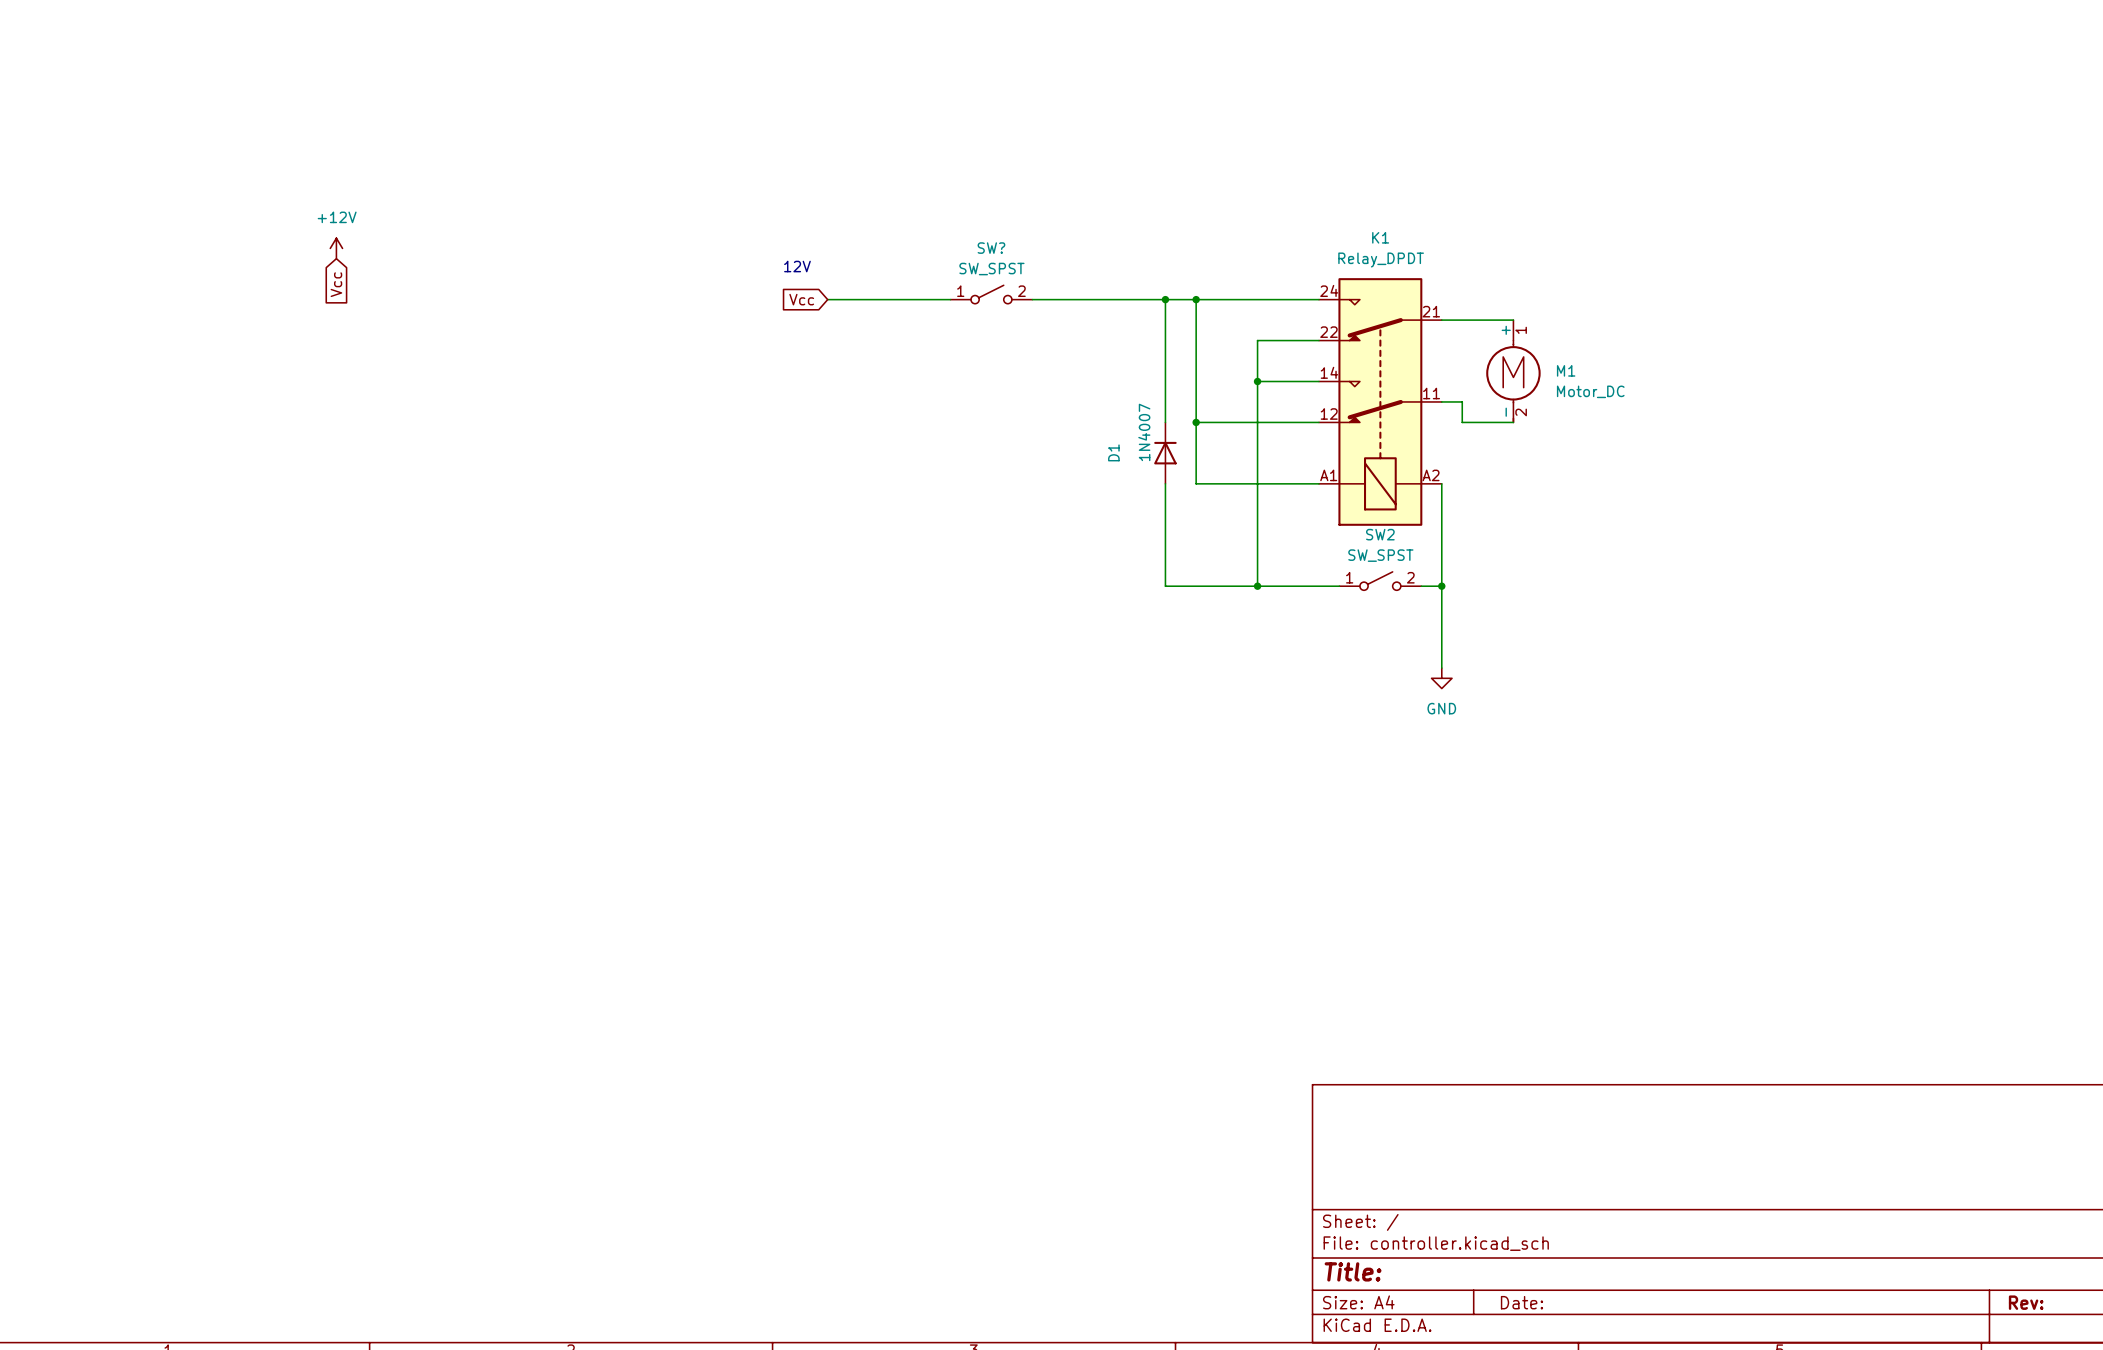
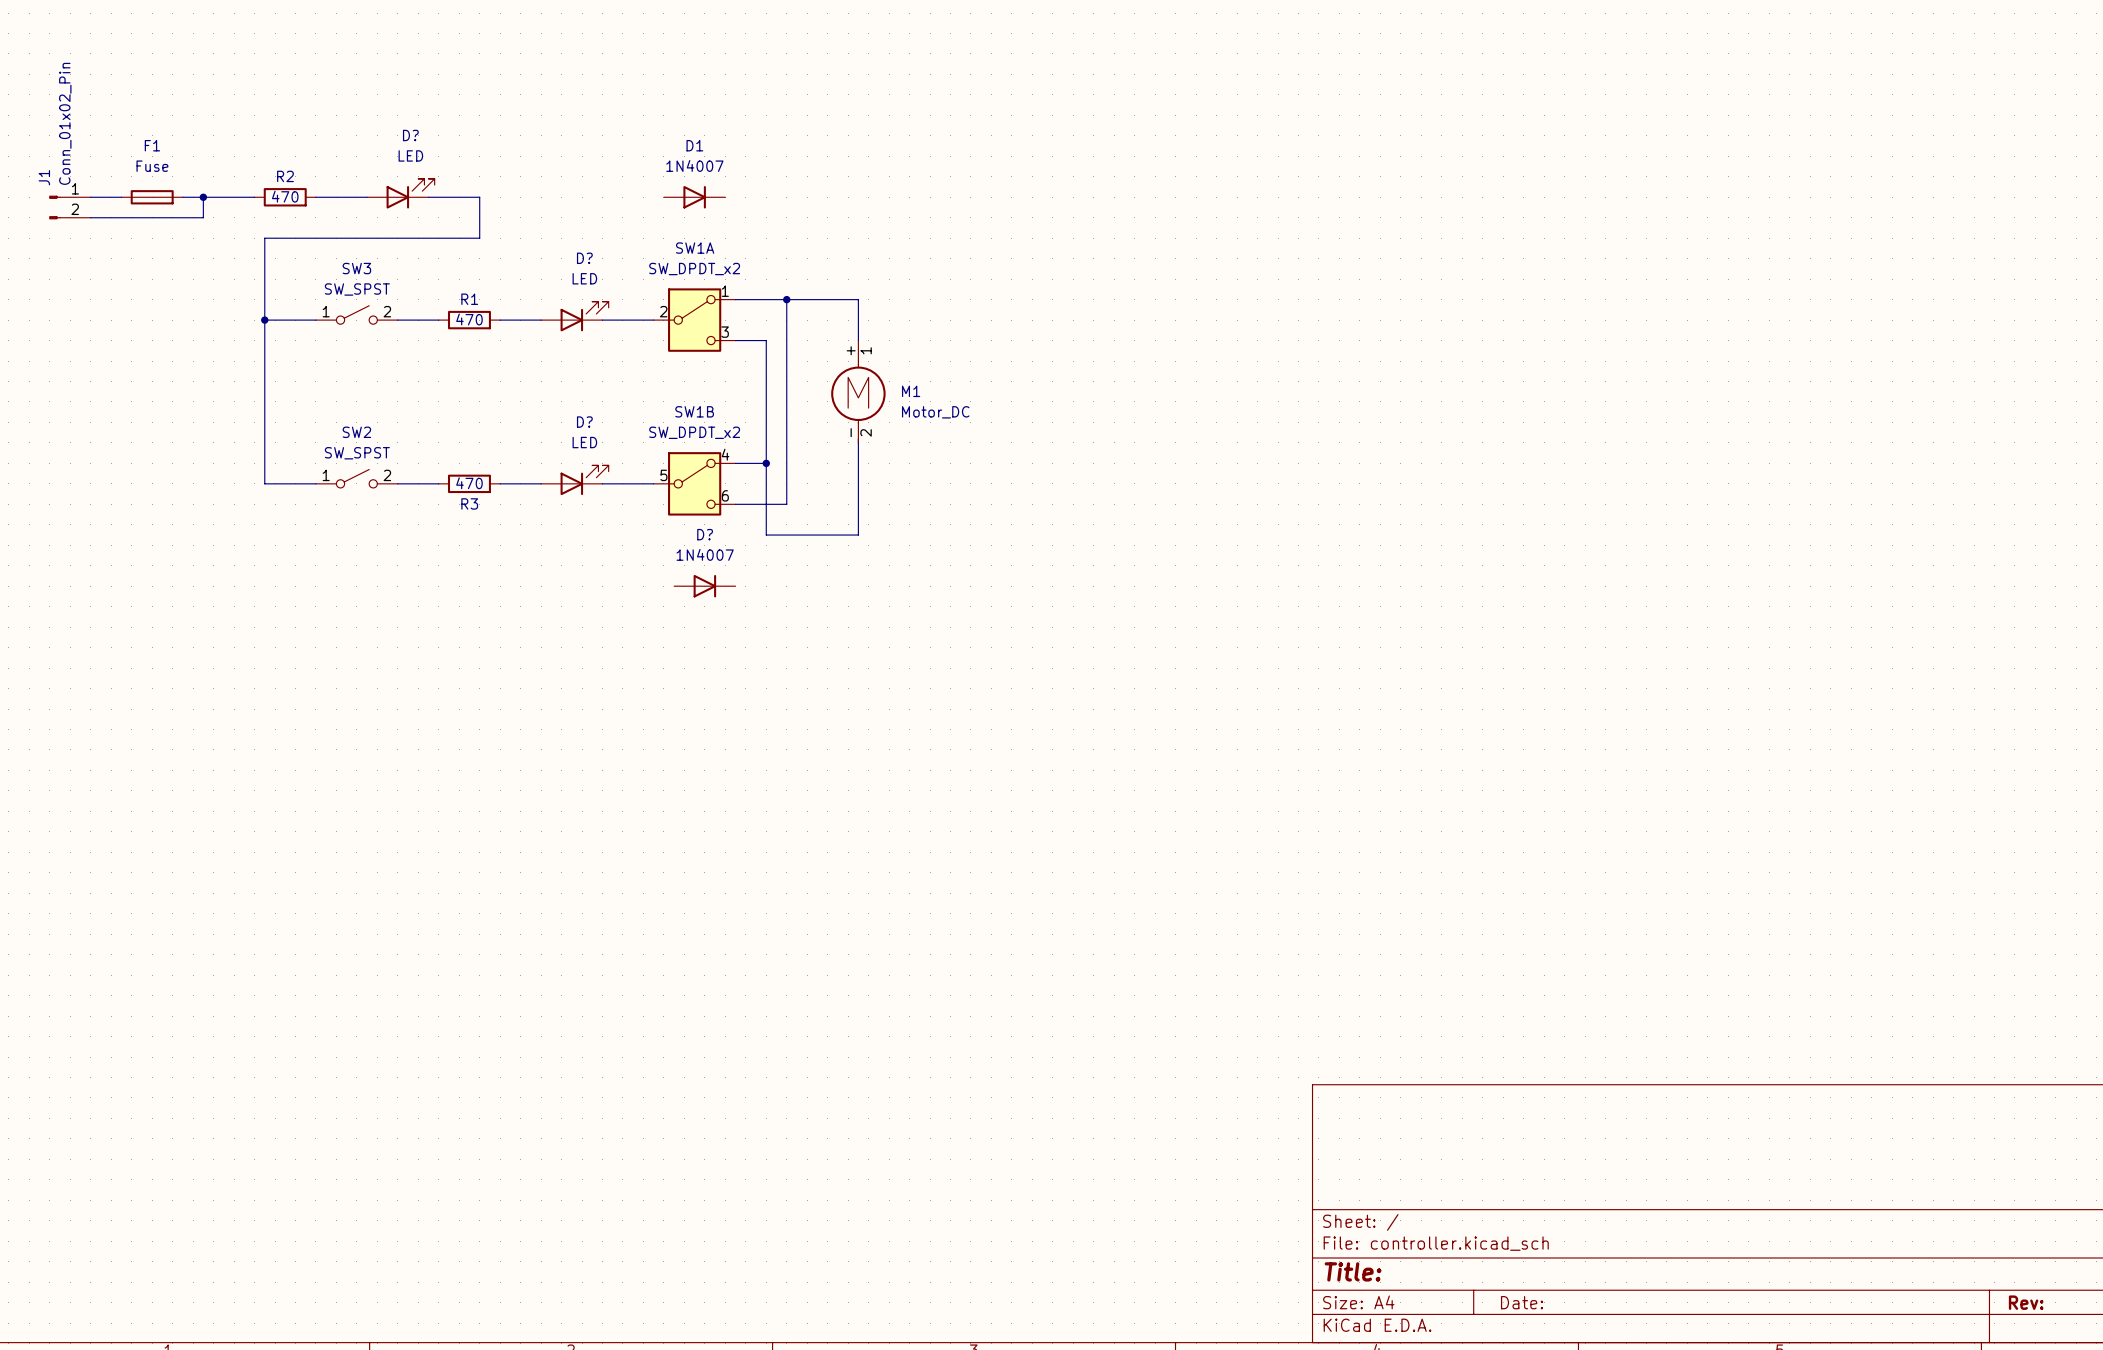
D?: none -> LED (400, 193)
wire: none -> (90, 197) (121, 197)
F1: none -> Fuse (152, 197)
wire: none -> (182, 197) (254, 197)
wire: none -> (203, 197) (203, 217) (90, 217)
junction: none -> (203, 197)
R2: none -> 470 (285, 197)
wire: none -> (315, 197) (367, 197)
wire: none -> (428, 197) (479, 197) (479, 238) (264, 238) (264, 483) (315, 483)
J1: none -> Conn_01x02_Pin (70, 207)
power symbol: +12V (336, 248) -> none
text: 12V (797, 266) -> none
global label: Vcc (336, 284) -> none
SW?: SW_SPST (991, 294) -> none
wire: none -> (735, 299) (827, 299)
wire: none -> (786, 299) (786, 504) (735, 504)
junction: none -> (786, 299)
global label: Vcc (801, 299) -> none
wire: (858, 299) (950, 299) -> (858, 299) (858, 340)
wire: (1032, 299) (1318, 299) -> none
wire: (1165, 299) (1165, 422) -> none
junction: (1165, 299) -> none
wire: (1196, 299) (1196, 483) (1318, 483) -> none
junction: (1196, 299) -> none
SW3: none -> SW_SPST (356, 314)
D?: none -> LED (574, 316)
wire: none -> (264, 320) (315, 320)
junction: none -> (264, 320)
wire: none -> (397, 320) (438, 320)
R1: none -> 470 (469, 320)
wire: none -> (500, 320) (541, 320)
wire: none -> (602, 320) (653, 320)
SW1A: none -> SW_DPDT_x2 (694, 320)
wire: (1441, 320) (1513, 320) -> none
wire: none -> (735, 340) (766, 340) (766, 535) (858, 535) (858, 442)
wire: (1318, 340) (1257, 340) (1257, 586) -> none
M1 position: (1513, 371) -> (858, 391)
wire: (1257, 381) (1318, 381) -> none
junction: (1257, 381) -> none
K1: Relay_DPDT (1380, 401) -> none
wire: (1441, 401) (1462, 401) (1462, 422) (1513, 422) -> none
wire: (1196, 422) (1318, 422) -> none
junction: (1196, 422) -> none
D1 value position: 1N4007 (1144, 432) -> 1N4007 (694, 165)
D1 rotation: 0° (1165, 453) -> 90° clockwise (694, 197)
D1 position: (1165, 453) -> (694, 197)
wire: none -> (735, 463) (766, 463)
junction: none -> (766, 463)
D?: none -> LED (574, 480)
wire: none -> (397, 483) (438, 483)
R3: none -> 470 (469, 483)
wire: none -> (500, 483) (541, 483)
wire: none -> (602, 483) (653, 483)
SW1B: none -> SW_DPDT_x2 (694, 483)
wire: (1165, 483) (1165, 586) (1339, 586) -> none
wire: (1441, 483) (1441, 668) -> none
SW2 position: (1380, 581) -> (356, 478)
D?: none -> 1N4007 (704, 586)
junction: (1257, 586) -> none
wire: (1421, 586) (1441, 586) -> none
junction: (1441, 586) -> none
power symbol: GND (1441, 678) -> none

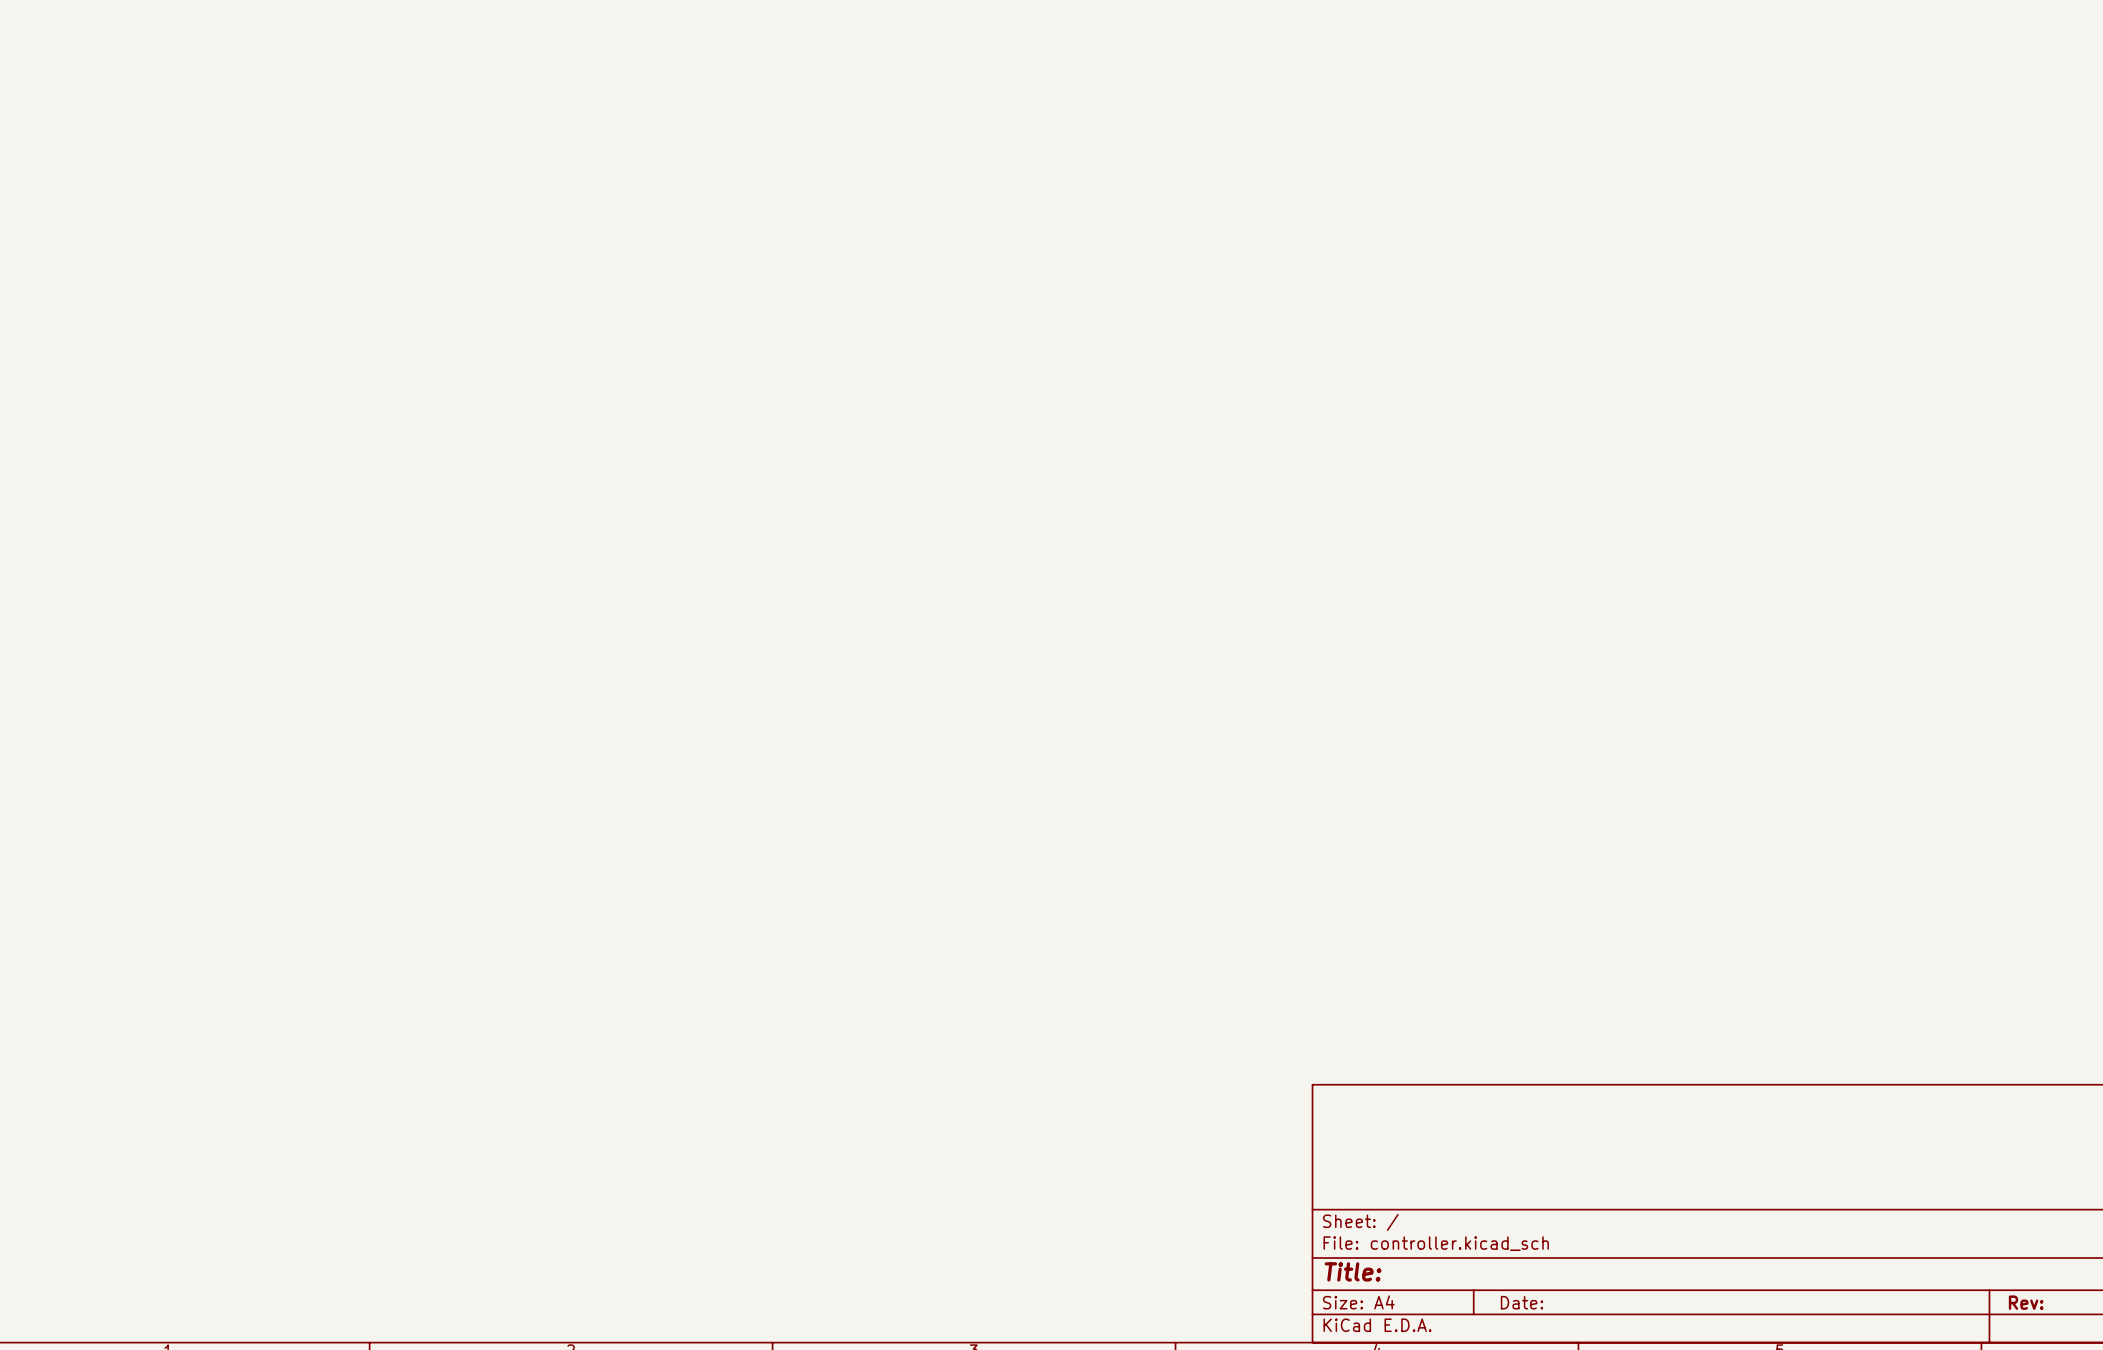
D?: LED (400, 193) -> none
wire: (90, 197) (121, 197) -> none
F1: Fuse (152, 197) -> none
wire: (182, 197) (254, 197) -> none
wire: (203, 197) (203, 217) (90, 217) -> none
junction: (203, 197) -> none
R2: 470 (285, 197) -> none
wire: (315, 197) (367, 197) -> none
wire: (428, 197) (479, 197) (479, 238) (264, 238) (264, 483) (315, 483) -> none
D1: 1N4007 (694, 197) -> none
J1: Conn_01x02_Pin (70, 207) -> none
wire: (735, 299) (858, 299) (858, 340) -> none
wire: (786, 299) (786, 504) (735, 504) -> none
junction: (786, 299) -> none
SW3: SW_SPST (356, 314) -> none
D?: LED (574, 316) -> none
wire: (264, 320) (315, 320) -> none
junction: (264, 320) -> none
wire: (397, 320) (438, 320) -> none
R1: 470 (469, 320) -> none
wire: (500, 320) (541, 320) -> none
wire: (602, 320) (653, 320) -> none
SW1A: SW_DPDT_x2 (694, 320) -> none
wire: (735, 340) (766, 340) (766, 535) (858, 535) (858, 442) -> none
M1: Motor_DC (858, 391) -> none
wire: (735, 463) (766, 463) -> none
junction: (766, 463) -> none
SW2: SW_SPST (356, 478) -> none
D?: LED (574, 480) -> none
wire: (397, 483) (438, 483) -> none
R3: 470 (469, 483) -> none
wire: (500, 483) (541, 483) -> none
wire: (602, 483) (653, 483) -> none
SW1B: SW_DPDT_x2 (694, 483) -> none
D?: 1N4007 (704, 586) -> none

